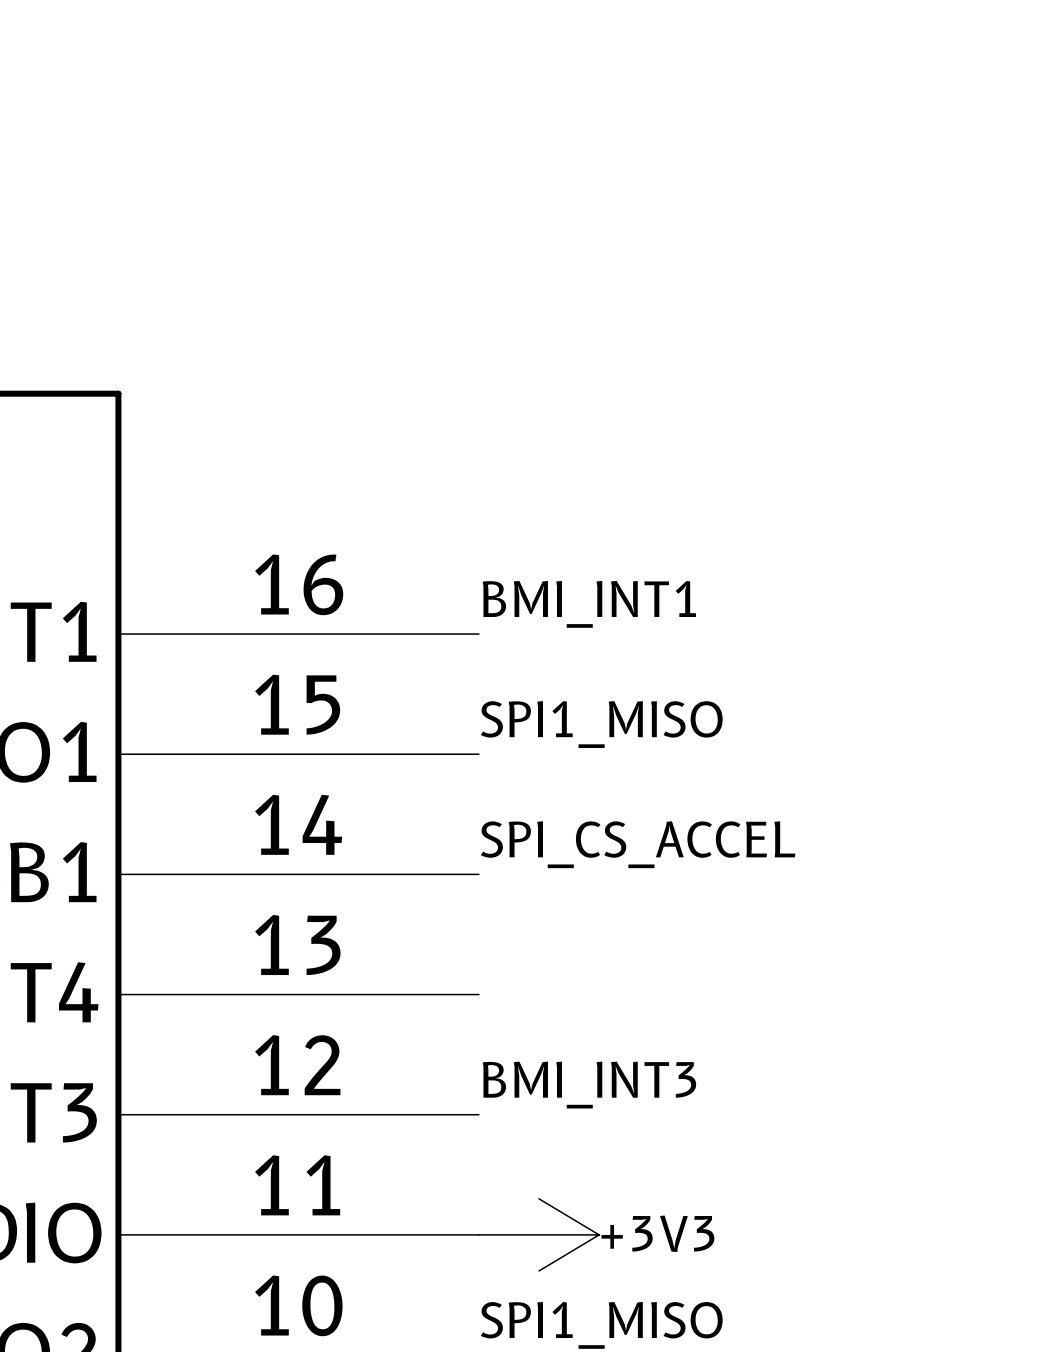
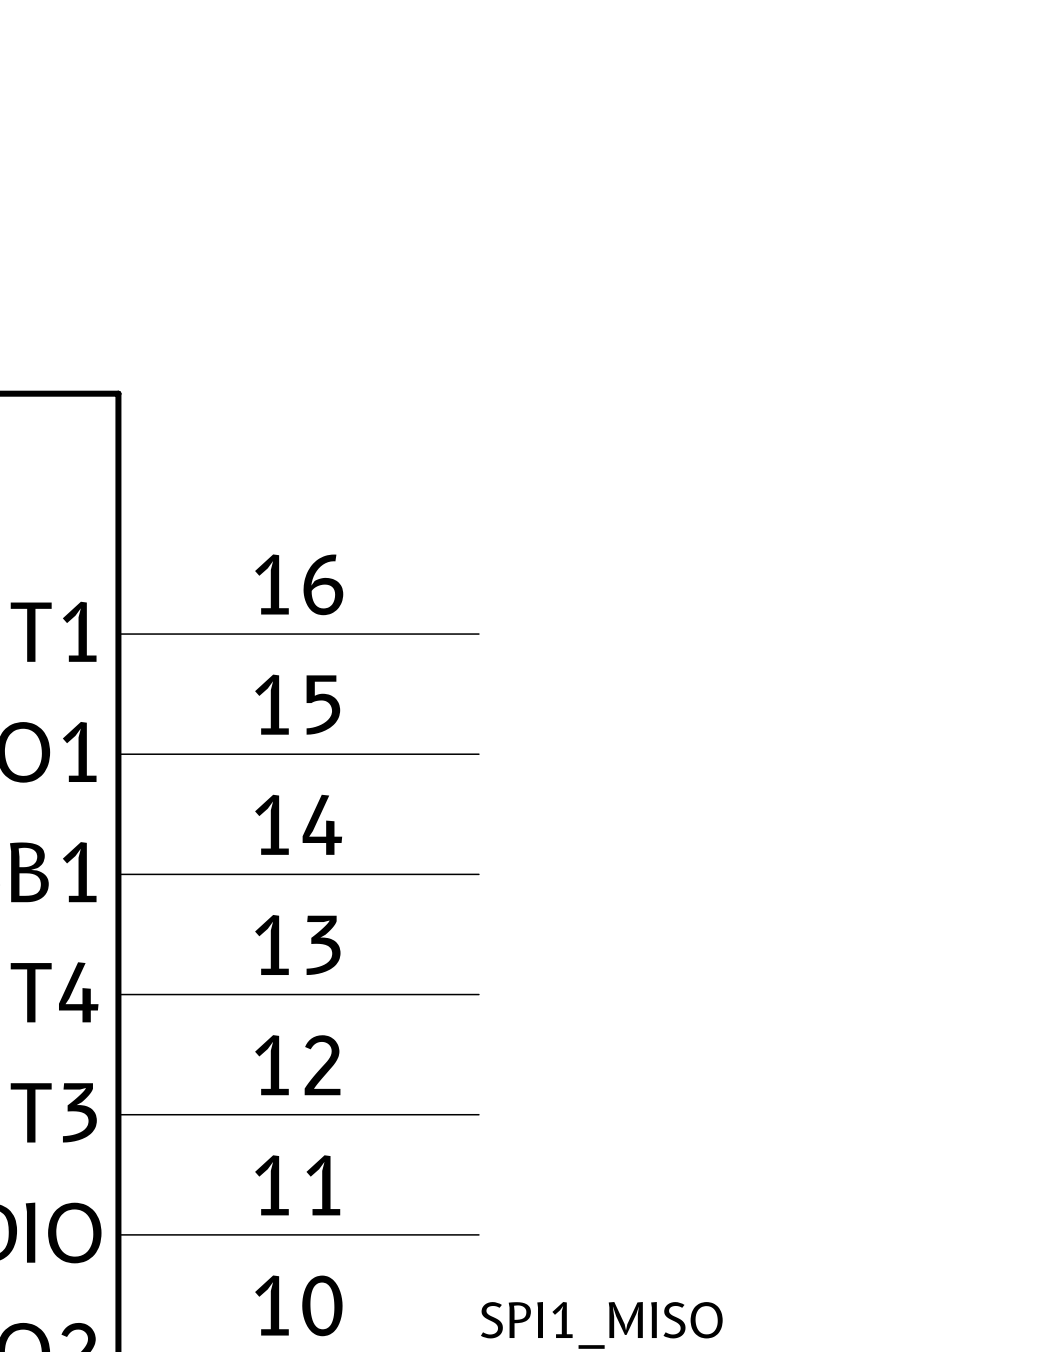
label: BMI_INT1 (589, 604) -> none
label: SPI1_MISO (601, 724) -> none
label: SPI_CS_ACCEL (638, 844) -> none
label: BMI_INT3 (589, 1085) -> none
power symbol: +3V3 (539, 1234) -> none

